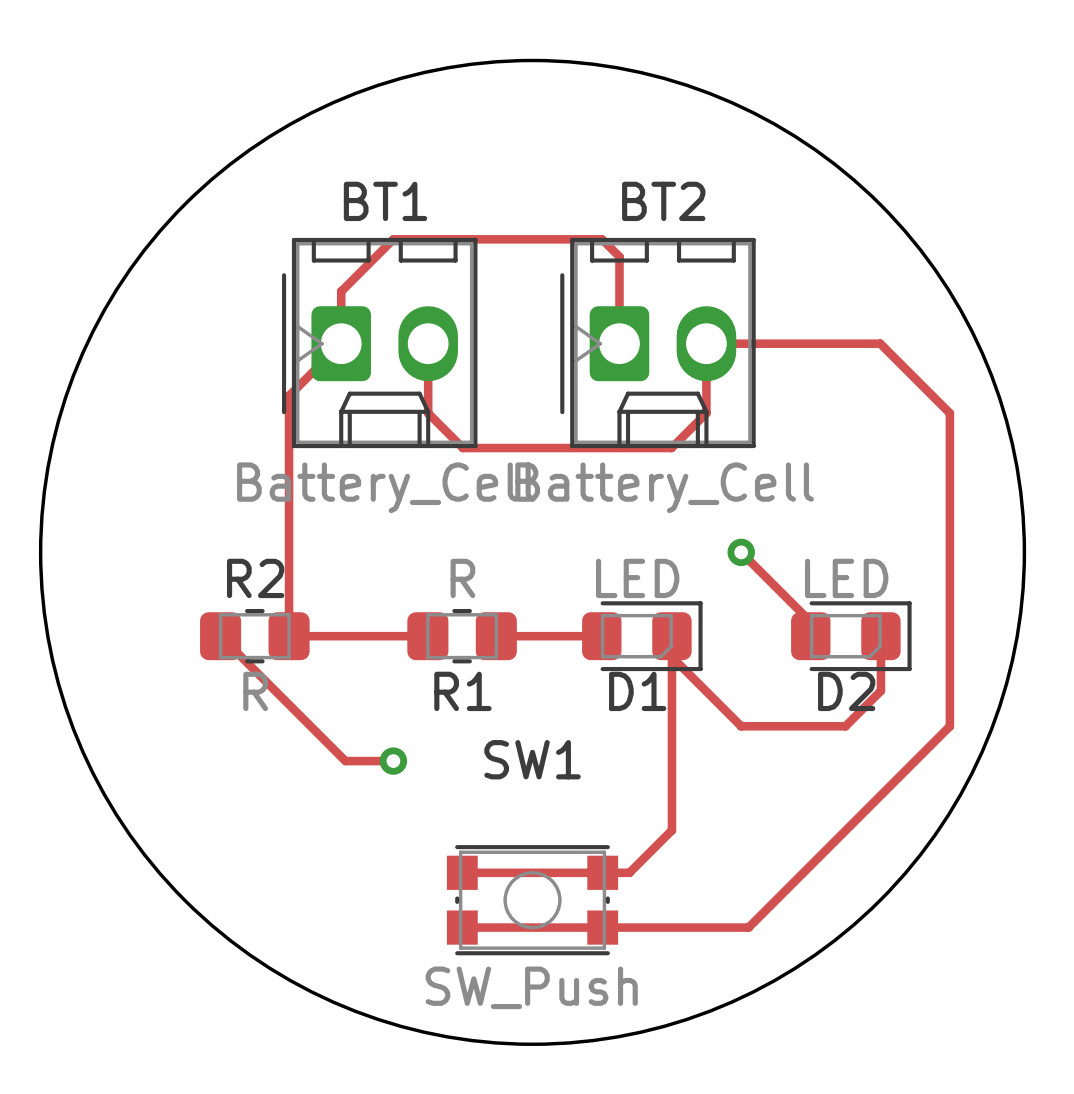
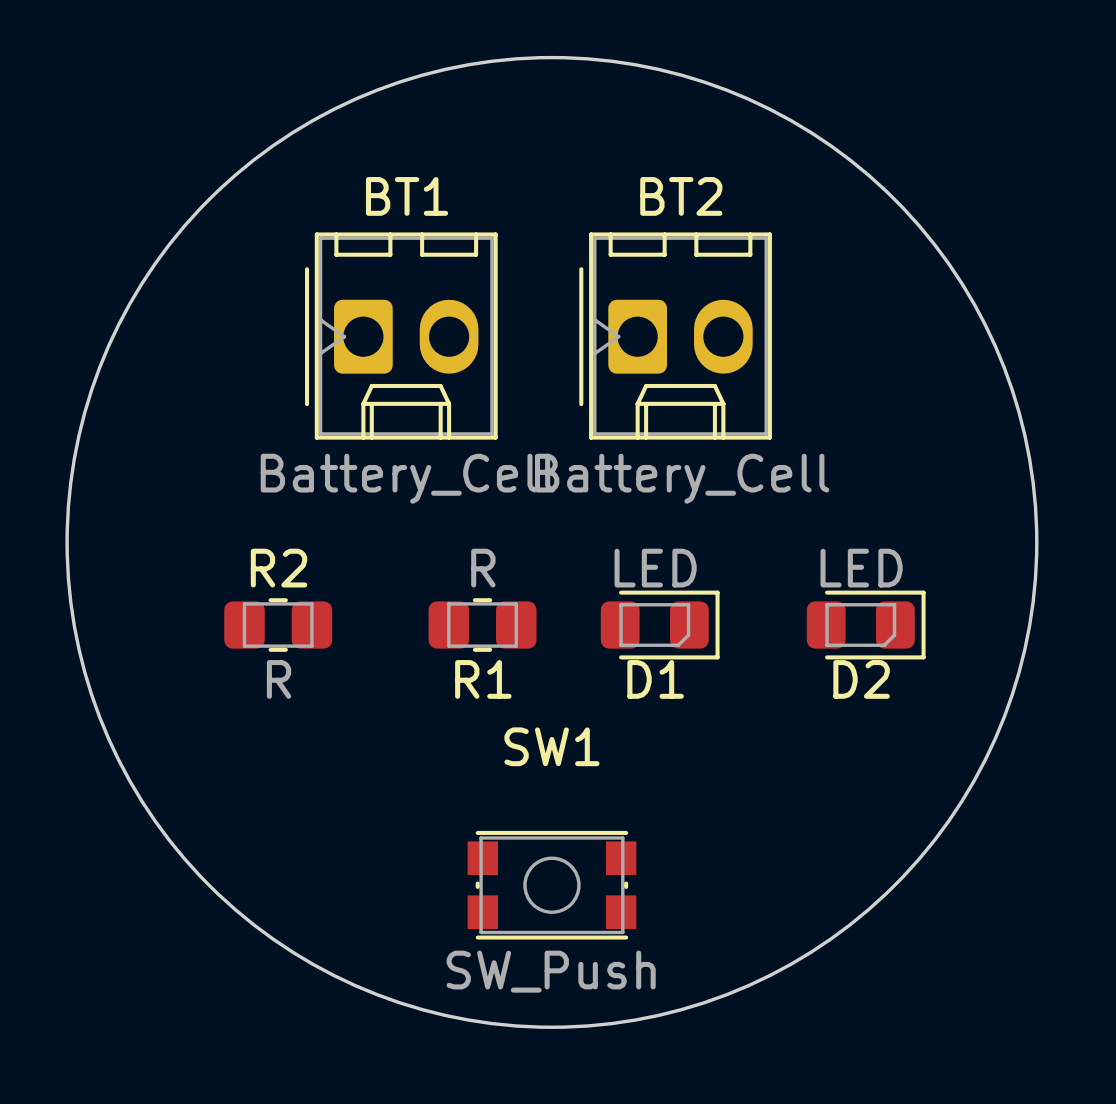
track: (428, 343) (428, 413) (462, 448) (671, 448) (706, 413) (706, 343) (880, 343) (949, 413) (949, 726) (748, 927) (462, 927) -> none
track: (619, 343) (619, 256) (602, 239) (393, 239) (341, 291) (341, 343) (289, 395) (289, 636) (427, 636) -> none
track: (741, 552) (810, 621) (810, 636) -> none
via: (741, 552) -> none
track: (220, 636) (345, 761) (393, 761) -> none
track: (496, 636) (601, 636) -> none
track: (671, 636) (671, 830) (629, 872) (462, 872) -> none
track: (880, 636) (880, 690) (845, 726) (741, 726) (671, 657) -> none
via: (393, 761) -> none

